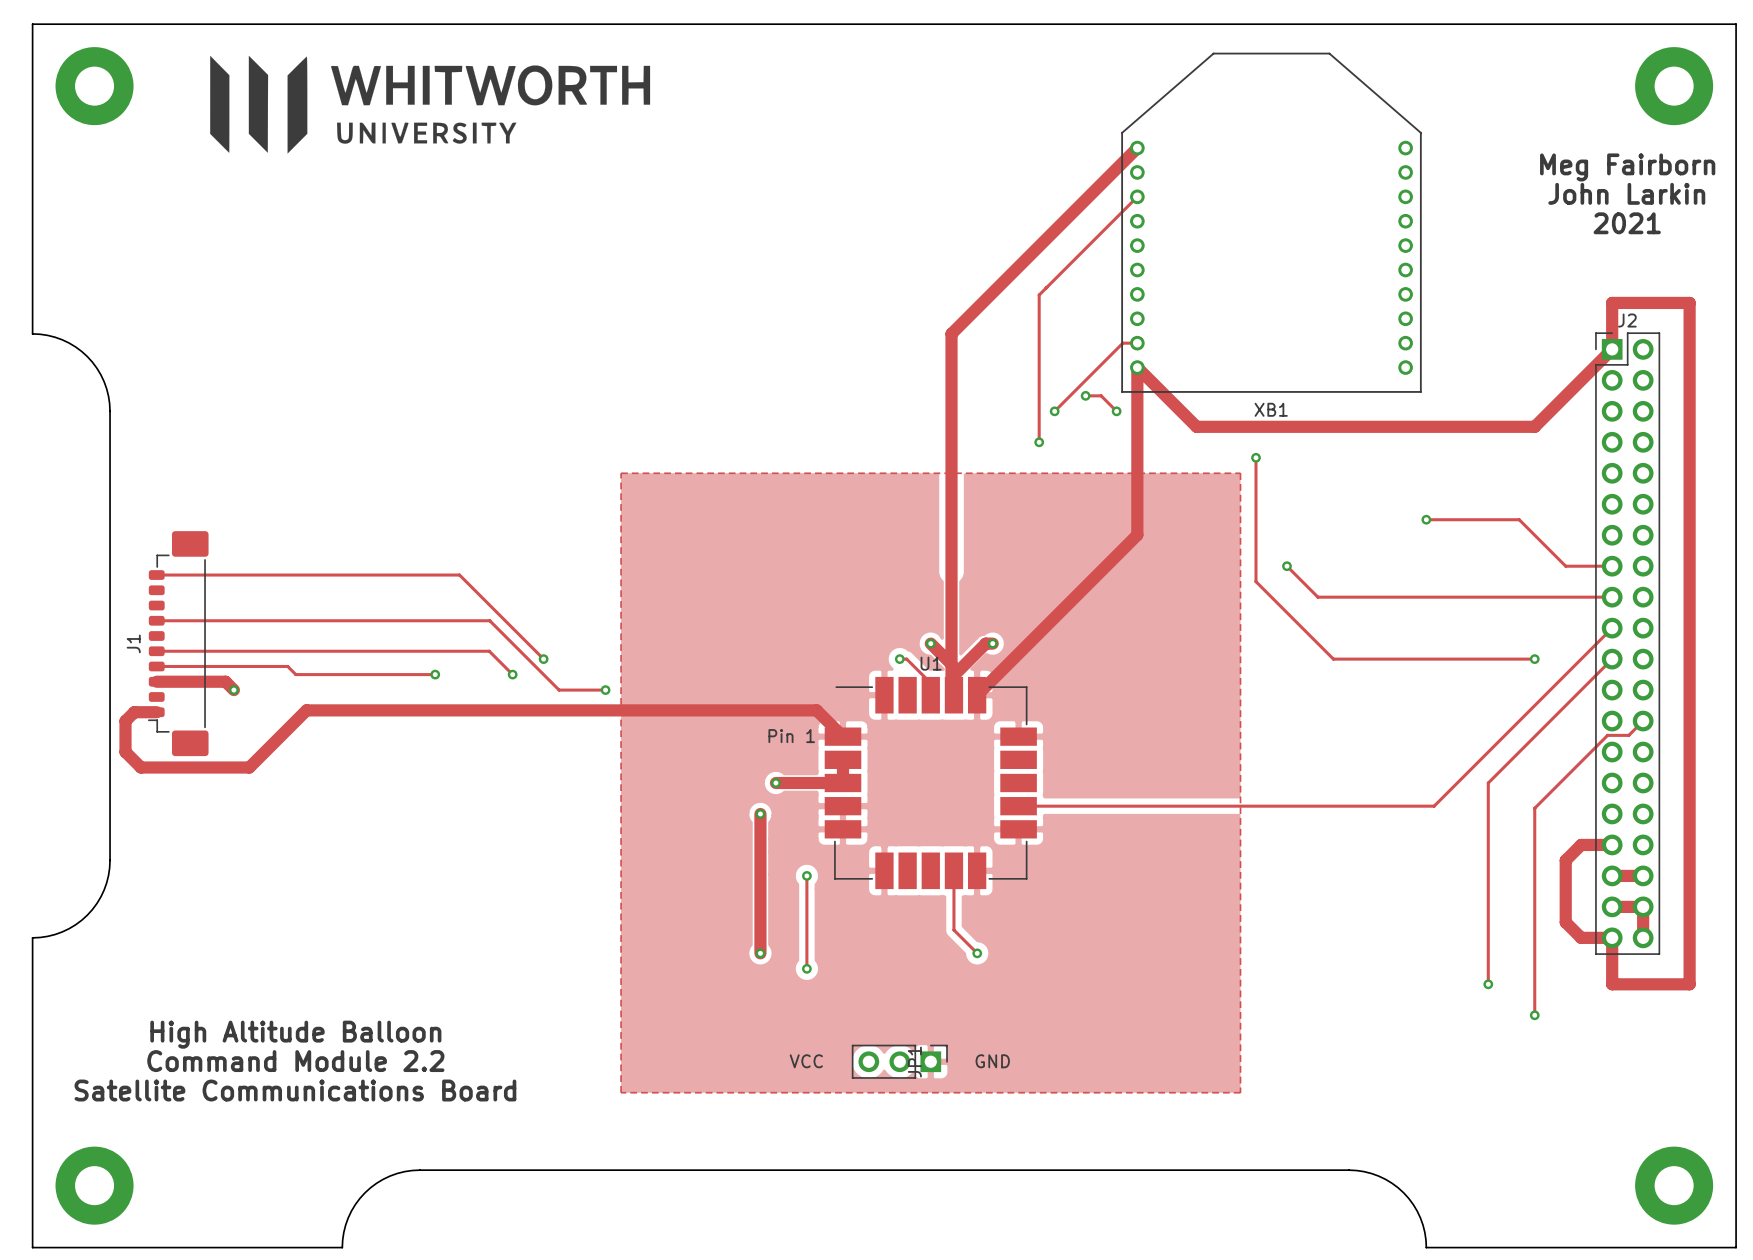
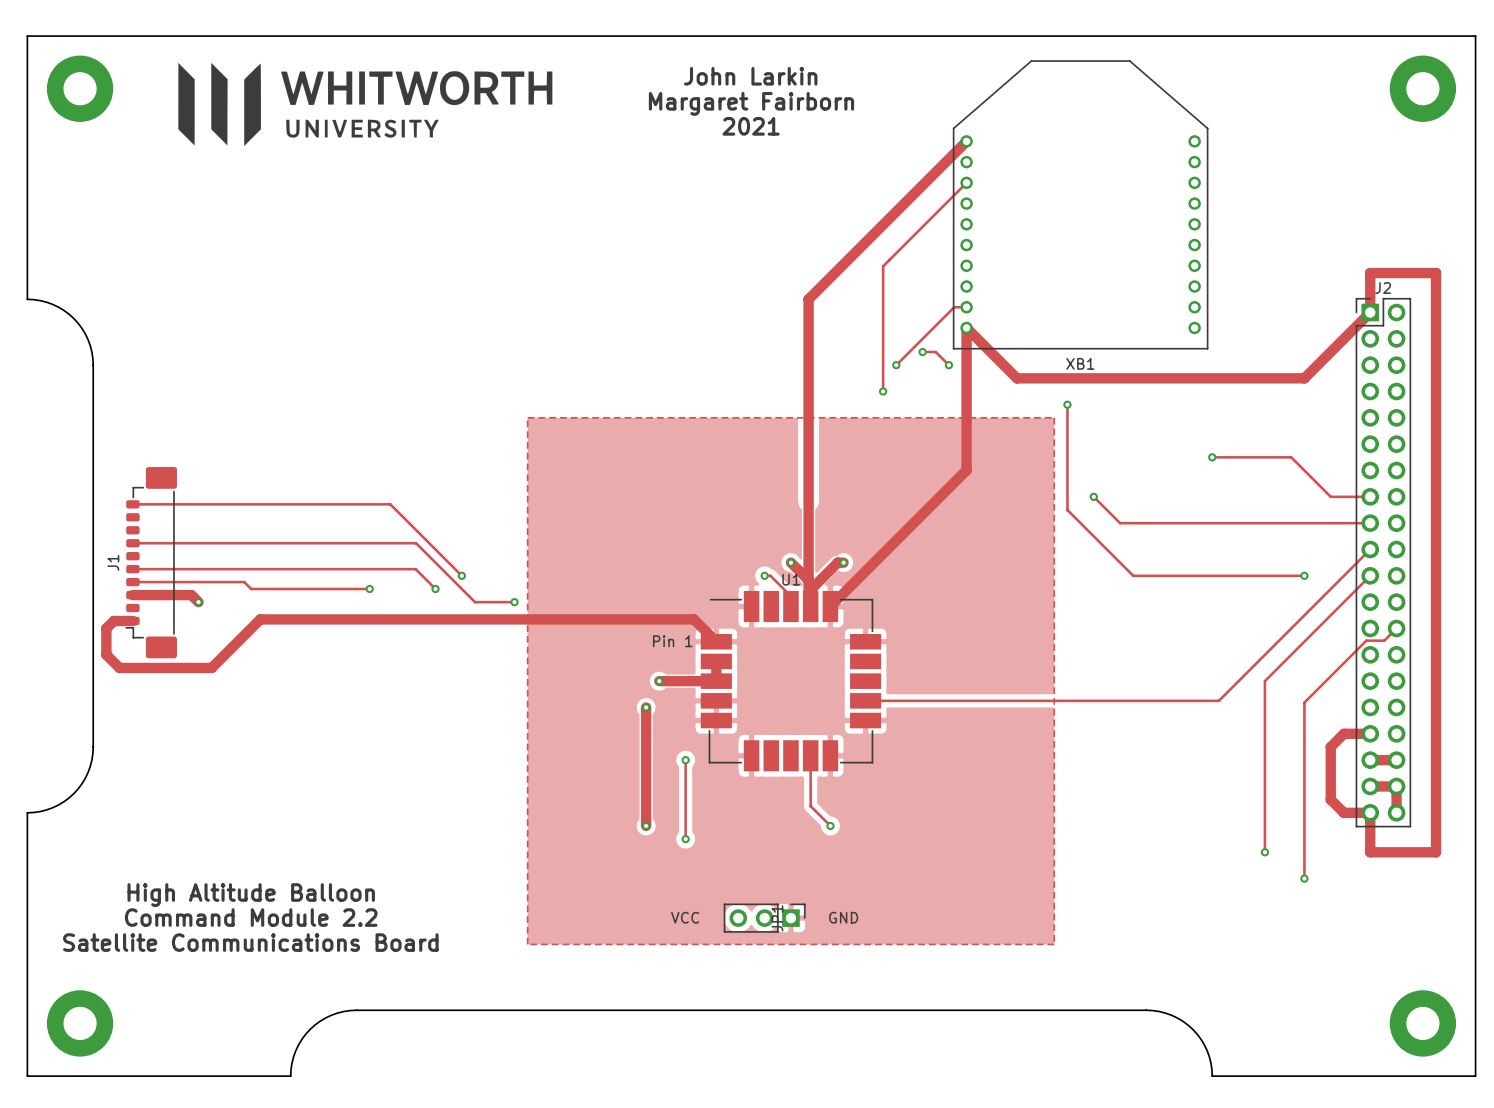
text: none -> John Larkin (750, 76)
text: none -> Margaret Fairborn (751, 103)
text: none -> 2021 (751, 126)
text: Meg Fairborn (1627, 167) -> none
text: John Larkin (1626, 193) -> none
text: 2021 (1627, 223) -> none

